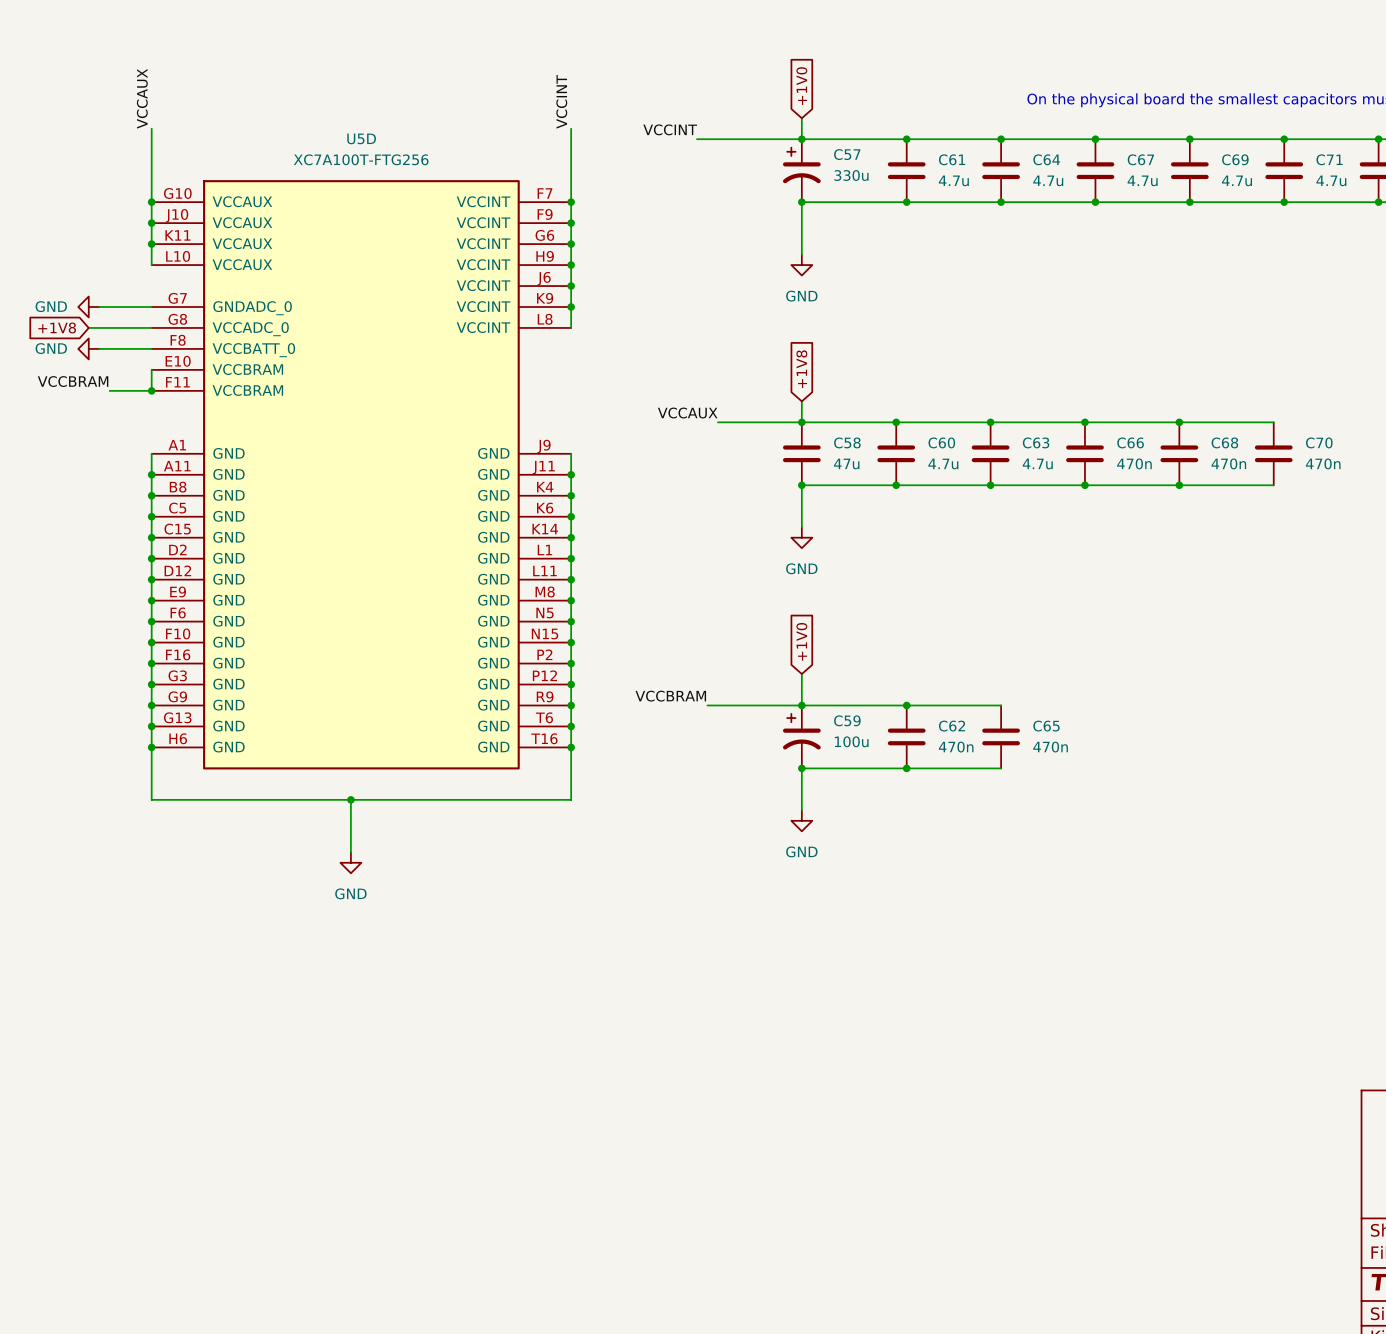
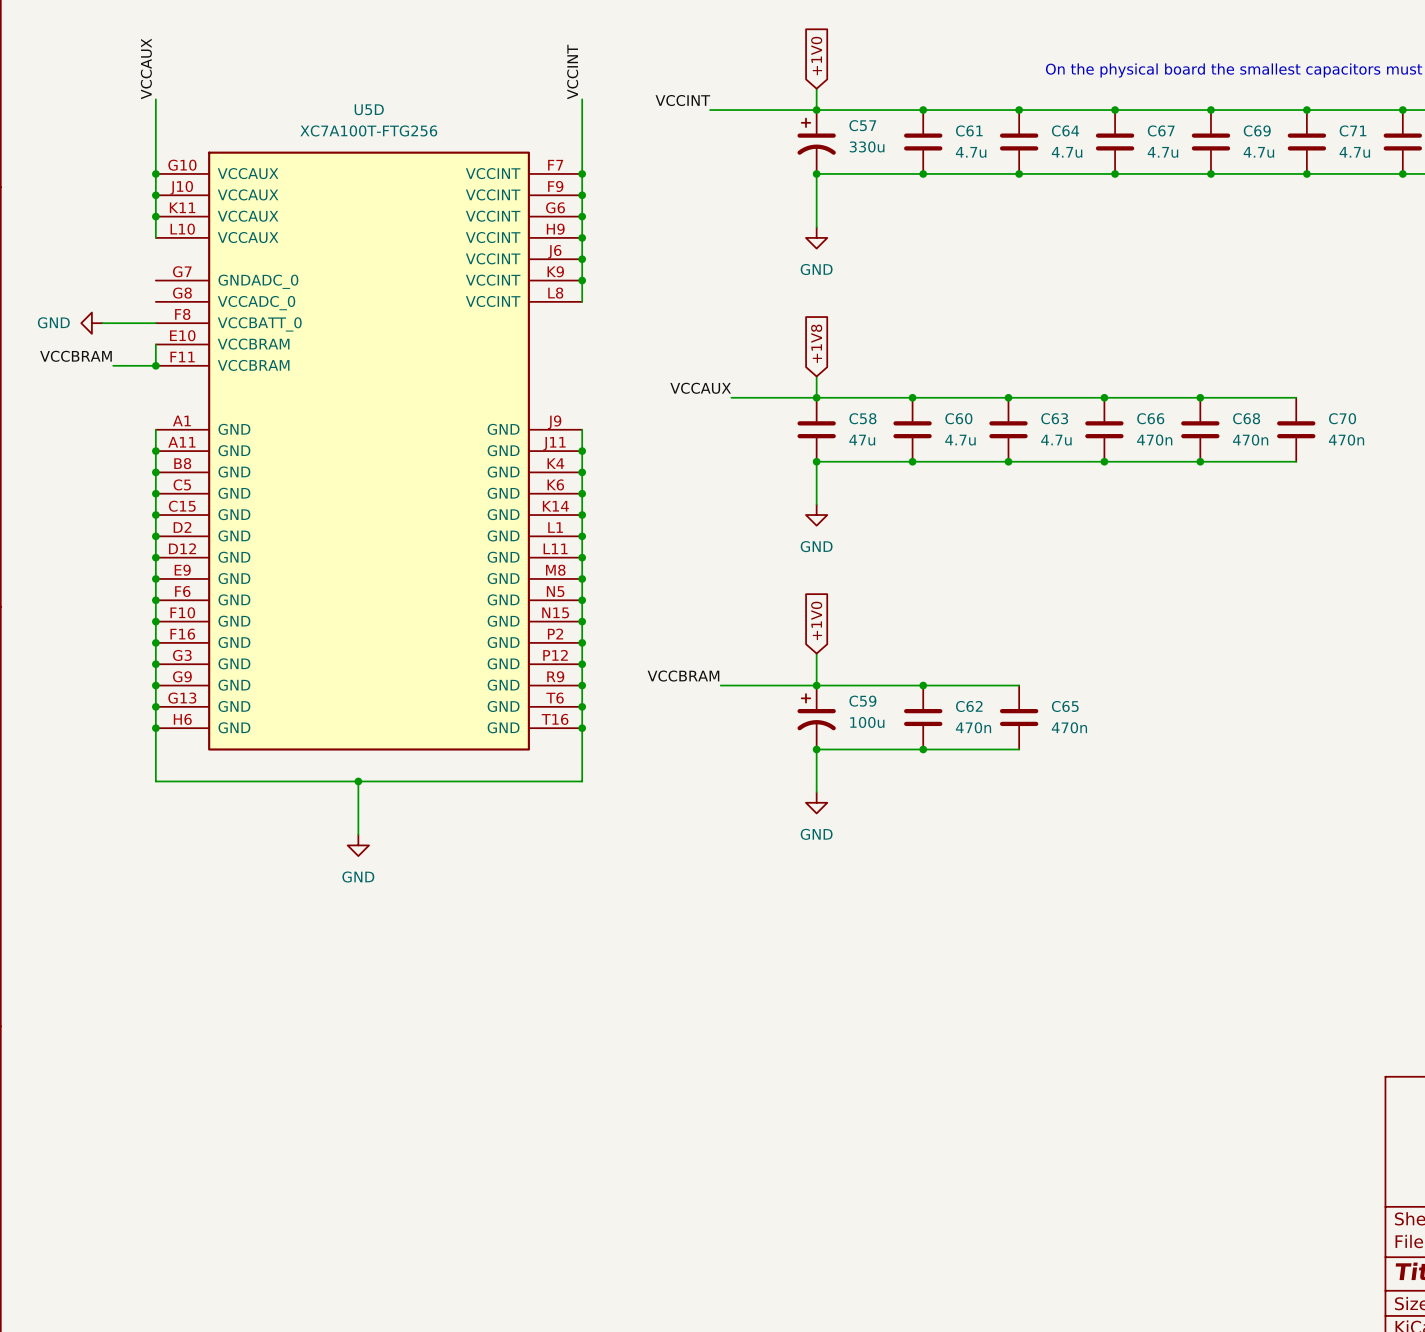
power symbol: GND (88, 306) -> none
wire: (99, 306) (151, 306) -> none
global label: +1V8 (57, 327) -> none
wire: (88, 327) (151, 327) -> none

